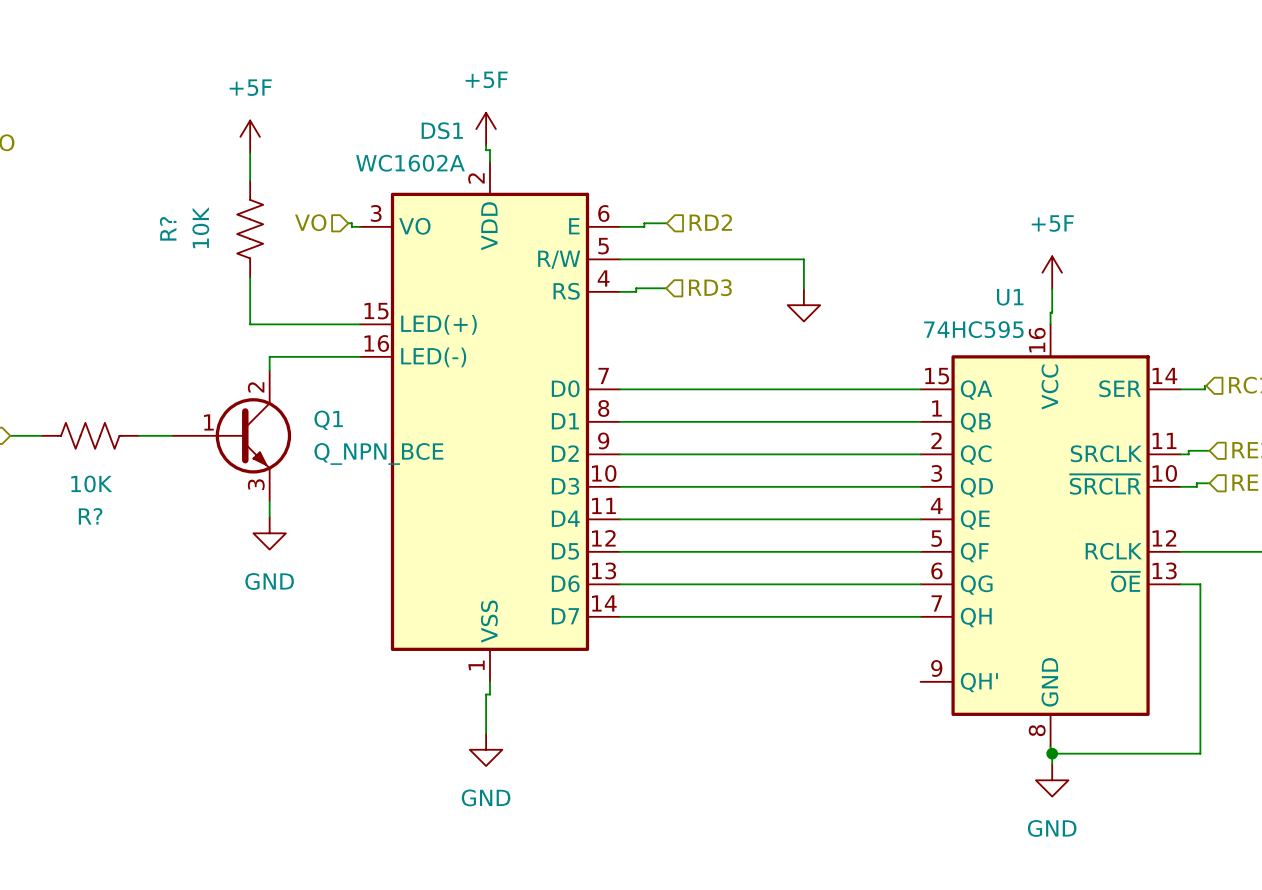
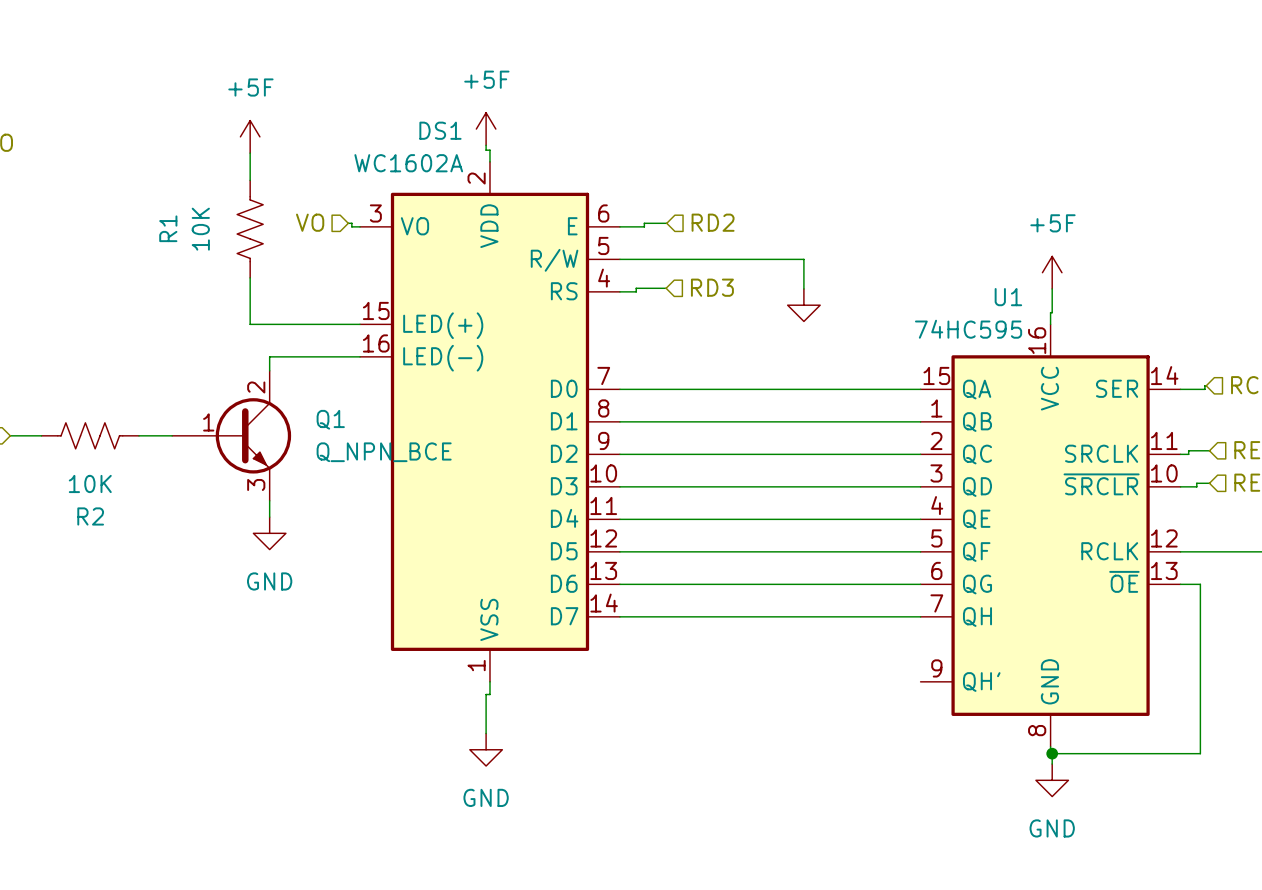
R? name: R? (168, 228) -> R1 (168, 228)
R? name: R? (90, 516) -> R2 (90, 516)

